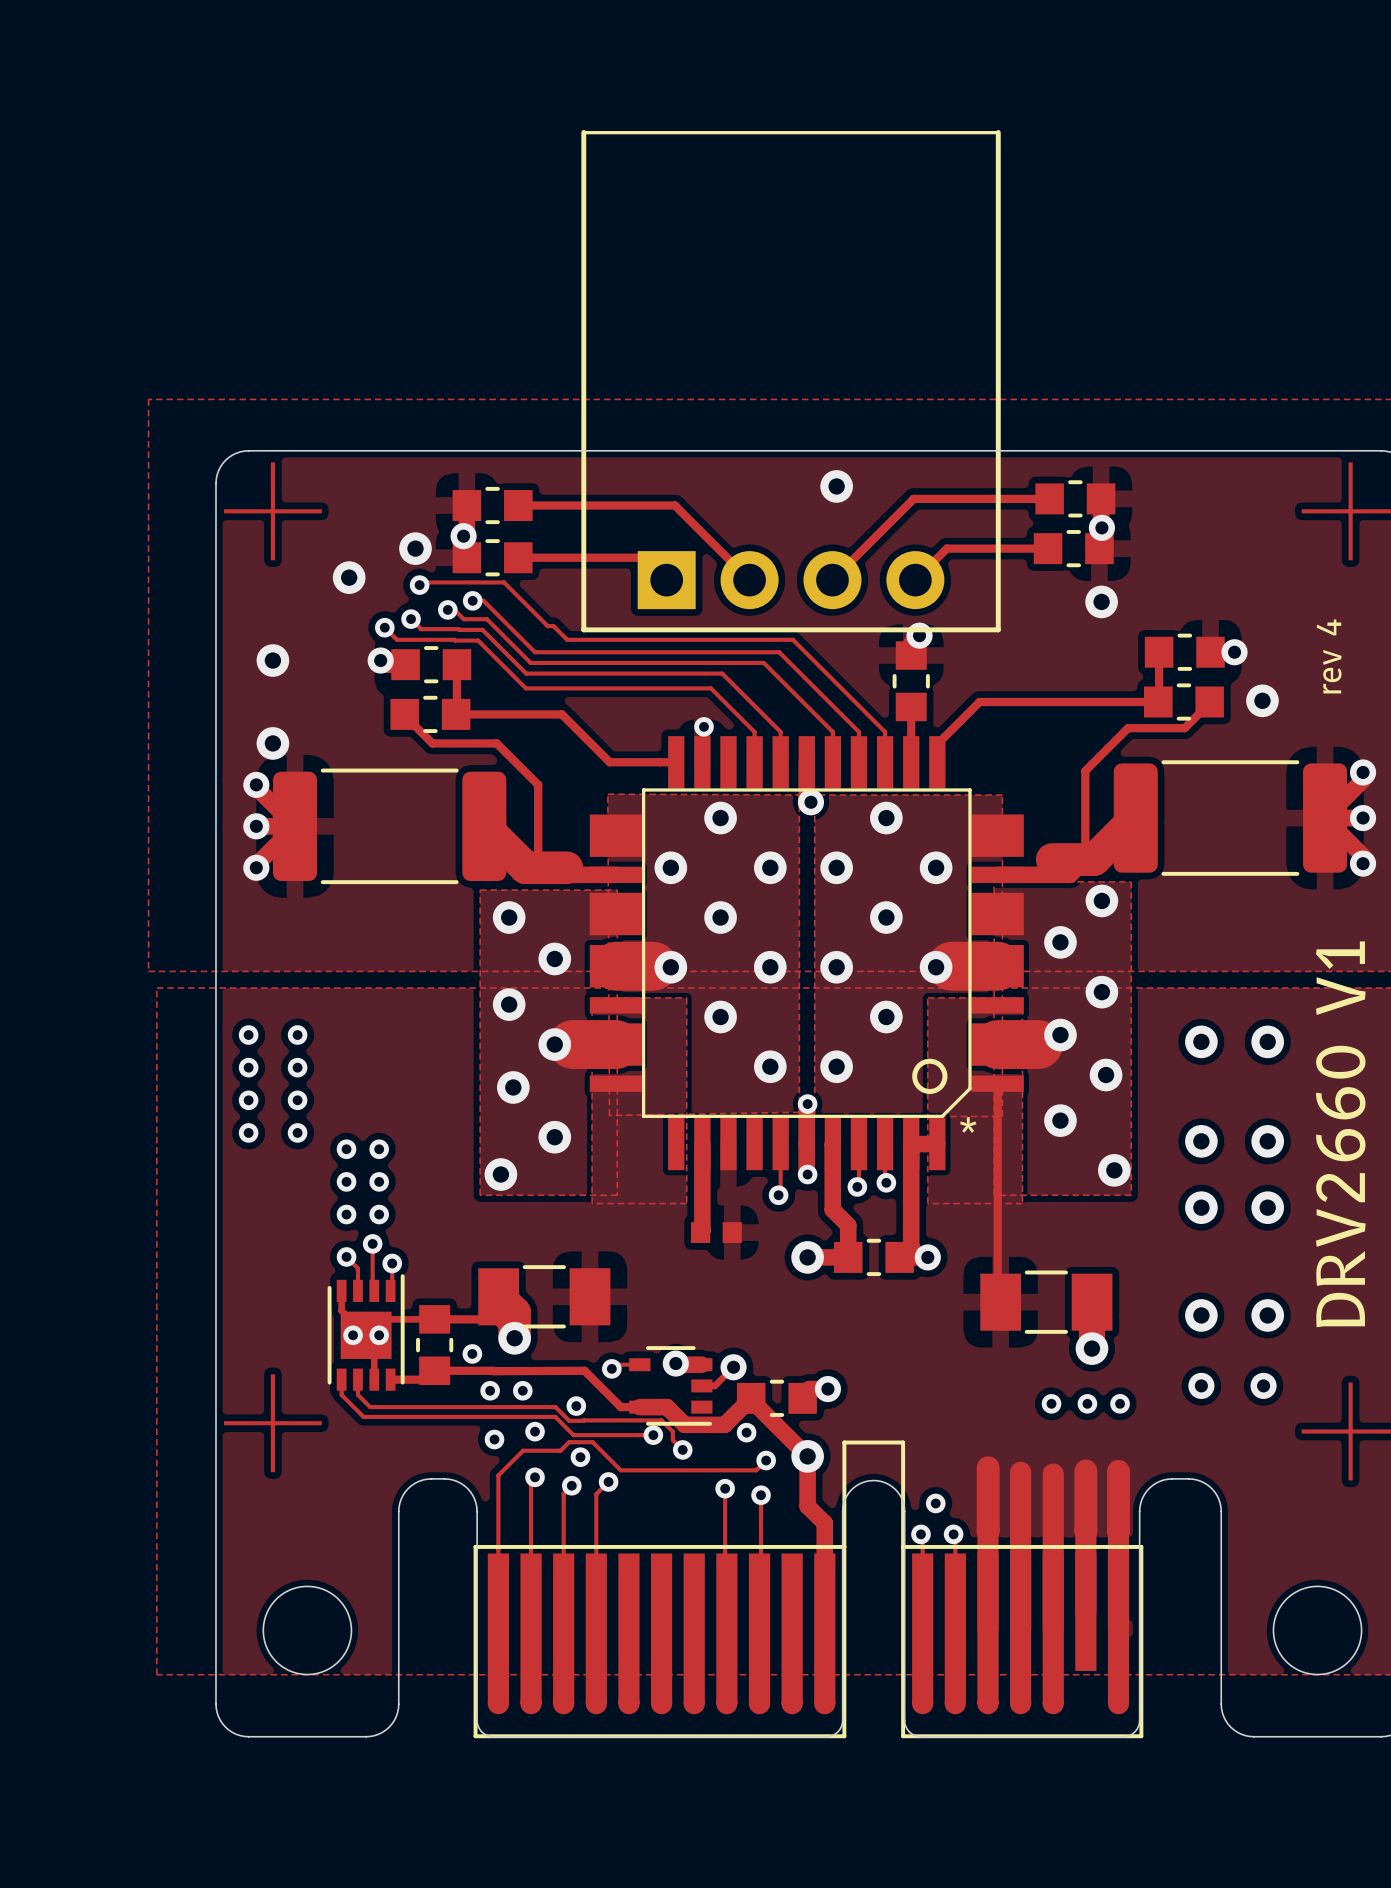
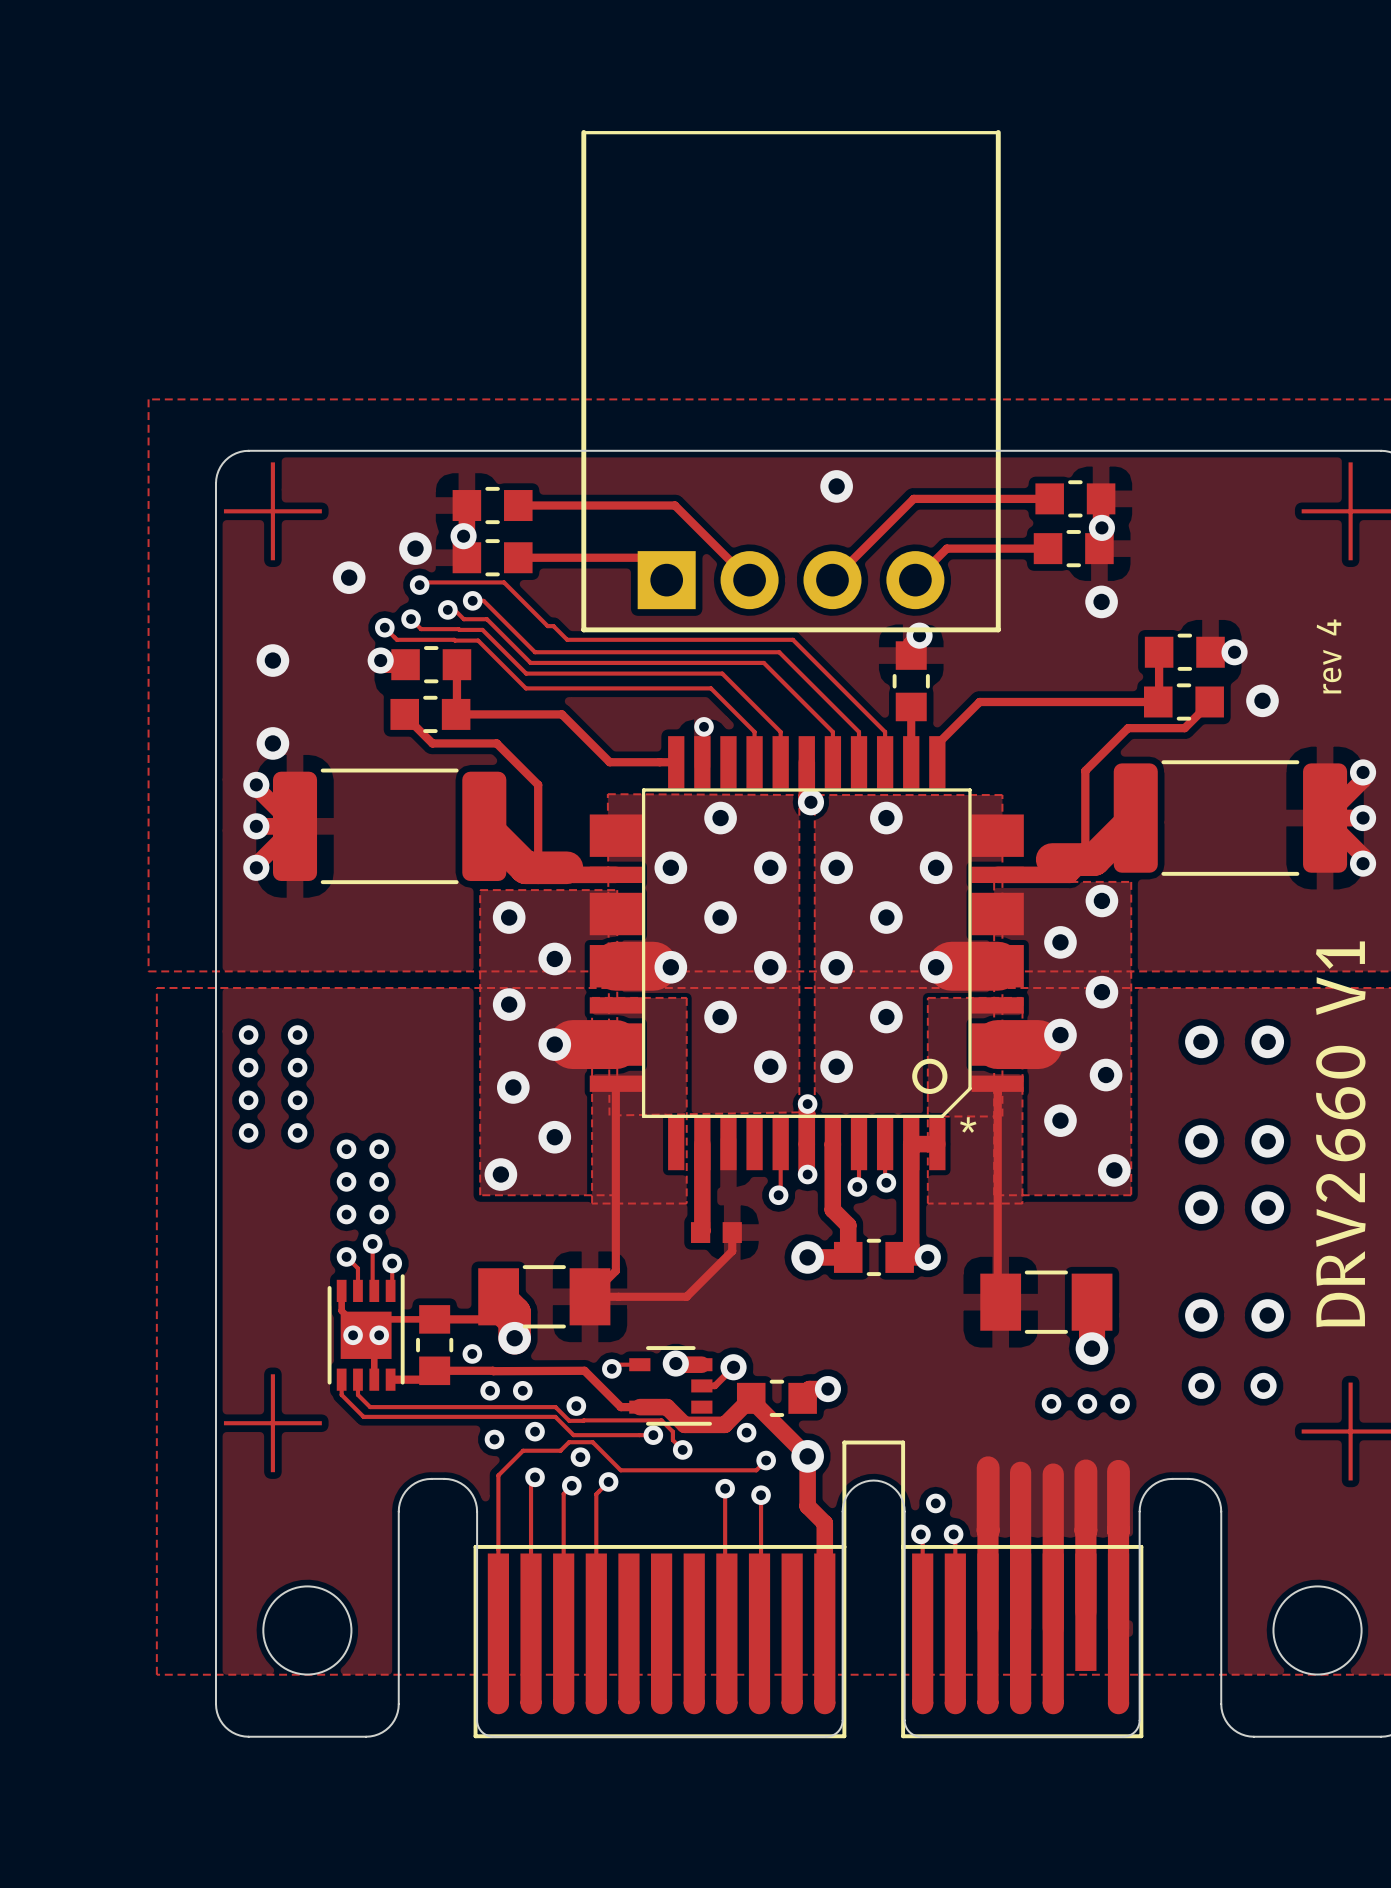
track: none -> (615, 1083) (615, 1270) (590, 1296) (686, 1296) (732, 1251) (732, 1232)

